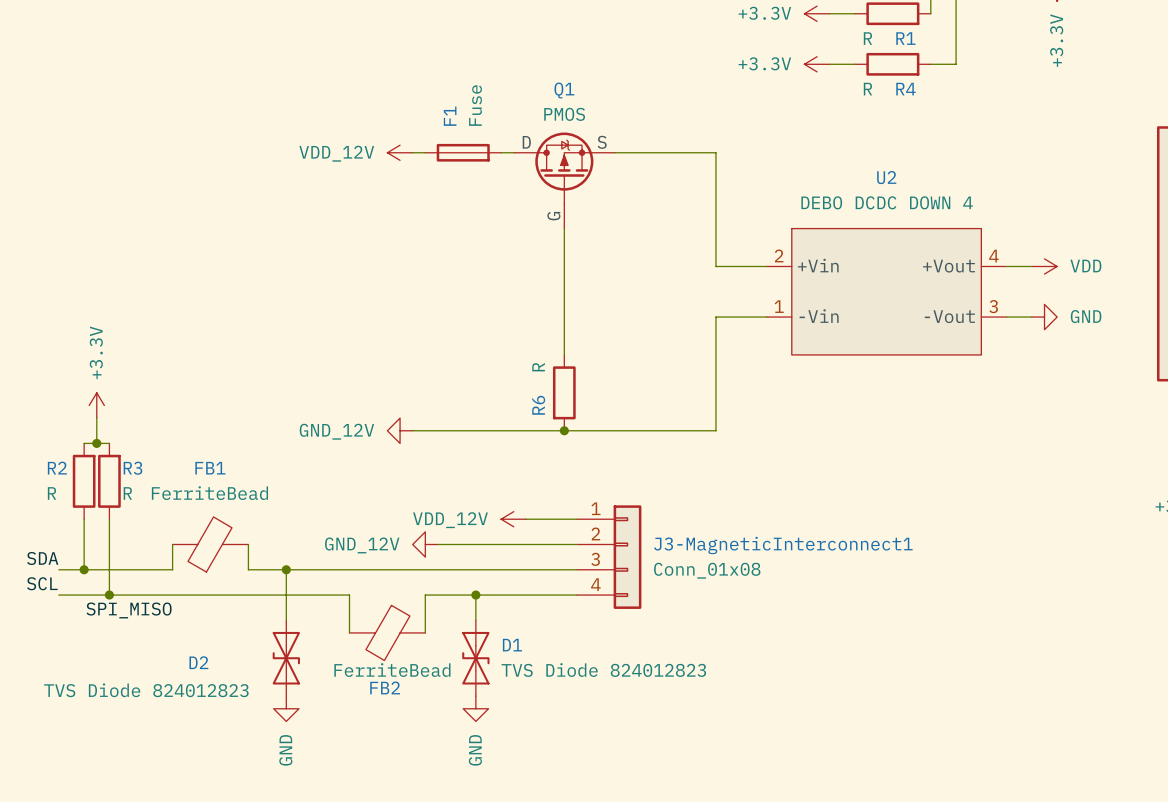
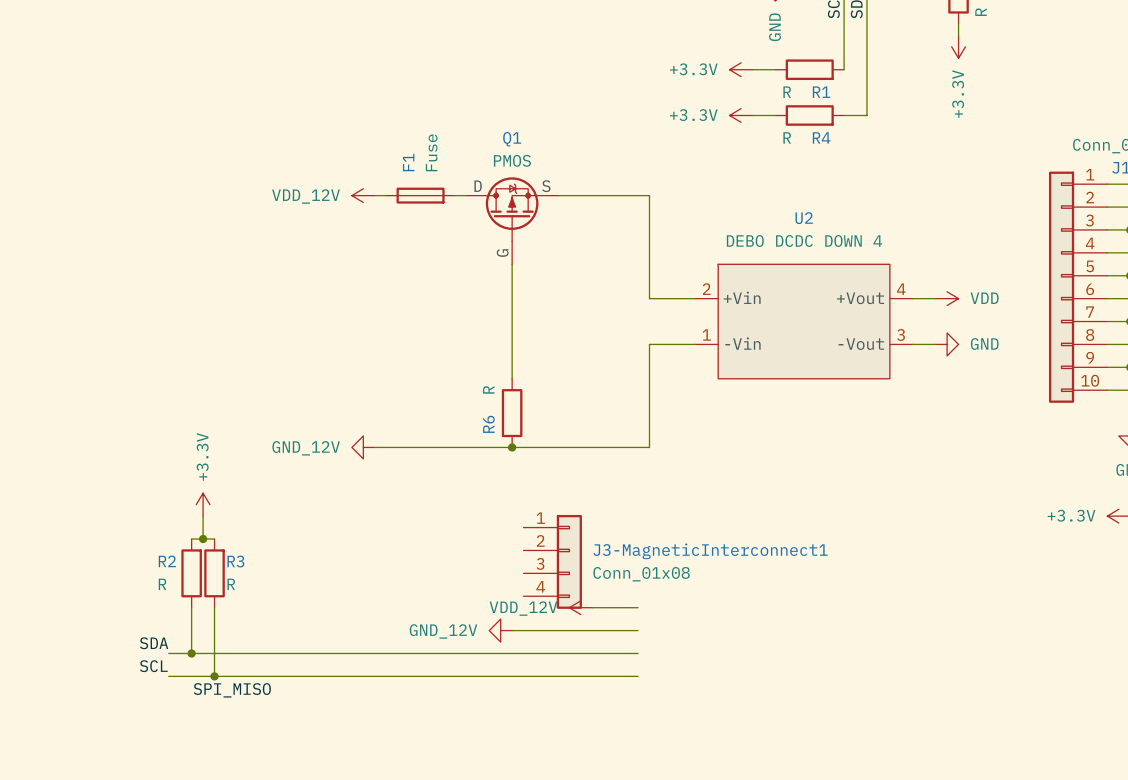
power symbol position: +3.3V (96, 405) -> +3.3V (203, 504)
wire: (96, 418) (96, 443) -> (203, 516) (203, 539)
wire: (84, 443) (109, 443) -> (191, 539) (214, 539)
junction: (96, 443) -> none
R2 position: (84, 481) -> (191, 573)
R3 position: (109, 481) -> (214, 573)
wire: (84, 519) (84, 569) -> (191, 607) (191, 653)
wire: (109, 519) (109, 595) -> (214, 607) (214, 676)
power symbol position: VDD_12V (513, 519) -> VDD_12V (580, 607)
wire: (526, 519) (576, 519) -> (592, 607) (638, 607)
junction: none -> (203, 539)
wire: (172, 544) (172, 569) (58, 569) -> none
FB1: FerriteBead (210, 544) -> none
wire: (248, 544) (248, 569) (576, 569) -> none
power symbol position: GND_12V (425, 544) -> GND_12V (500, 630)
wire: (437, 544) (576, 544) -> (512, 630) (638, 630)
label position: SDA (42, 558) -> SDA (154, 643)
junction: (84, 569) -> none
wire: (286, 569) (286, 620) -> none
junction: (286, 569) -> none
label position: SCL (42, 583) -> SCL (153, 666)
wire: (58, 595) (349, 595) (349, 632) -> none
junction: (109, 595) -> none
wire: (475, 595) (475, 620) -> none
junction: (475, 595) -> none
wire: (576, 595) (425, 595) (425, 632) -> none
label position: SPI_MISO (129, 610) -> SPI_MISO (232, 690)
FB2: FerriteBead (387, 632) -> none
wire: none -> (168, 653) (638, 653)
junction: none -> (191, 653)
D2: TVS Diode 824012823 (286, 658) -> none
D1: TVS Diode 824012823 (475, 658) -> none
wire: none -> (168, 676) (638, 676)
junction: none -> (214, 676)
power symbol: GND (286, 708) -> none
power symbol: GND (475, 708) -> none

